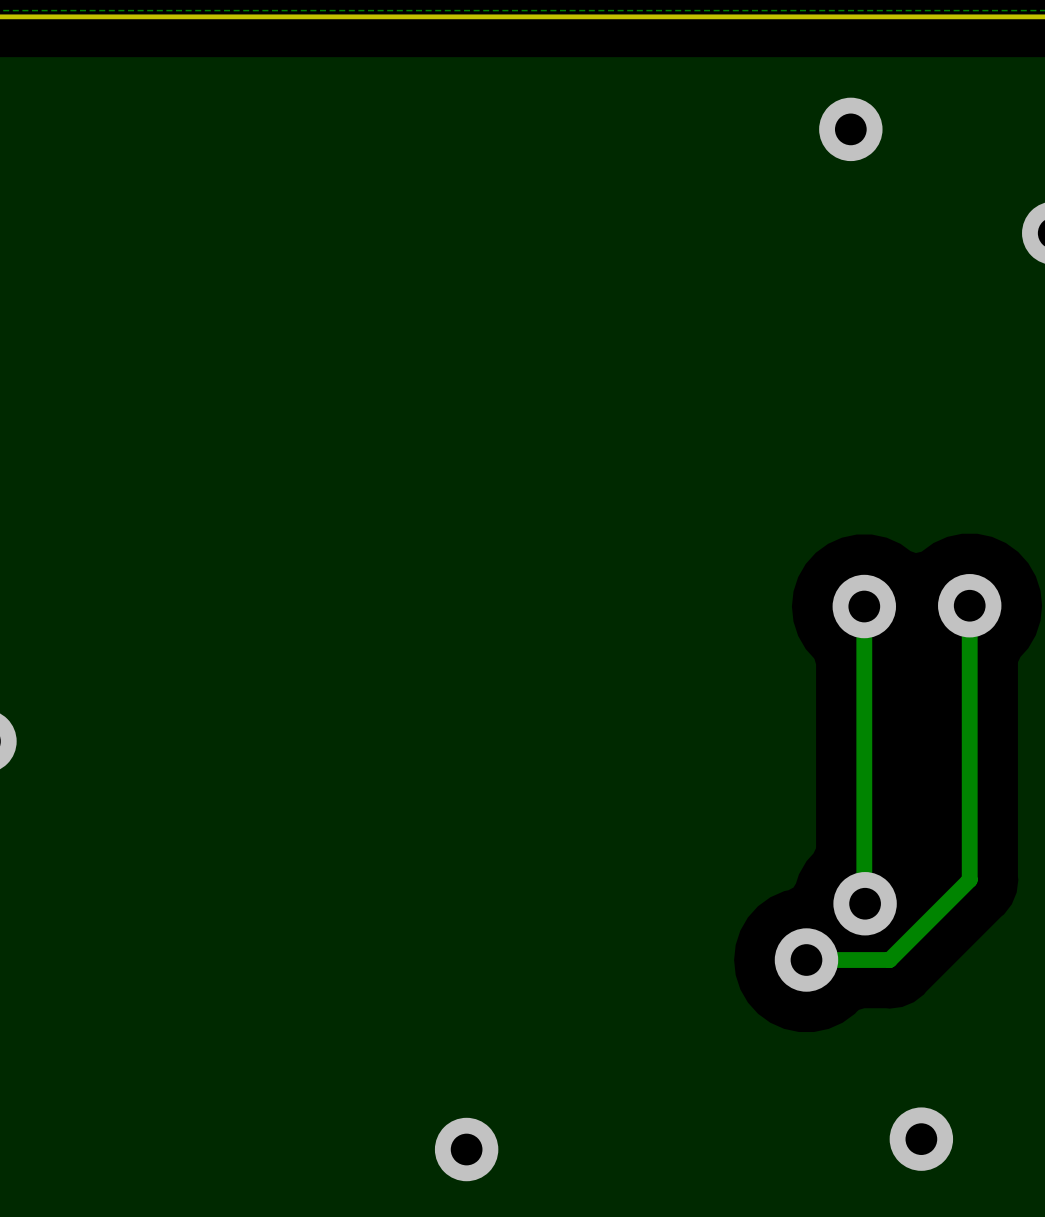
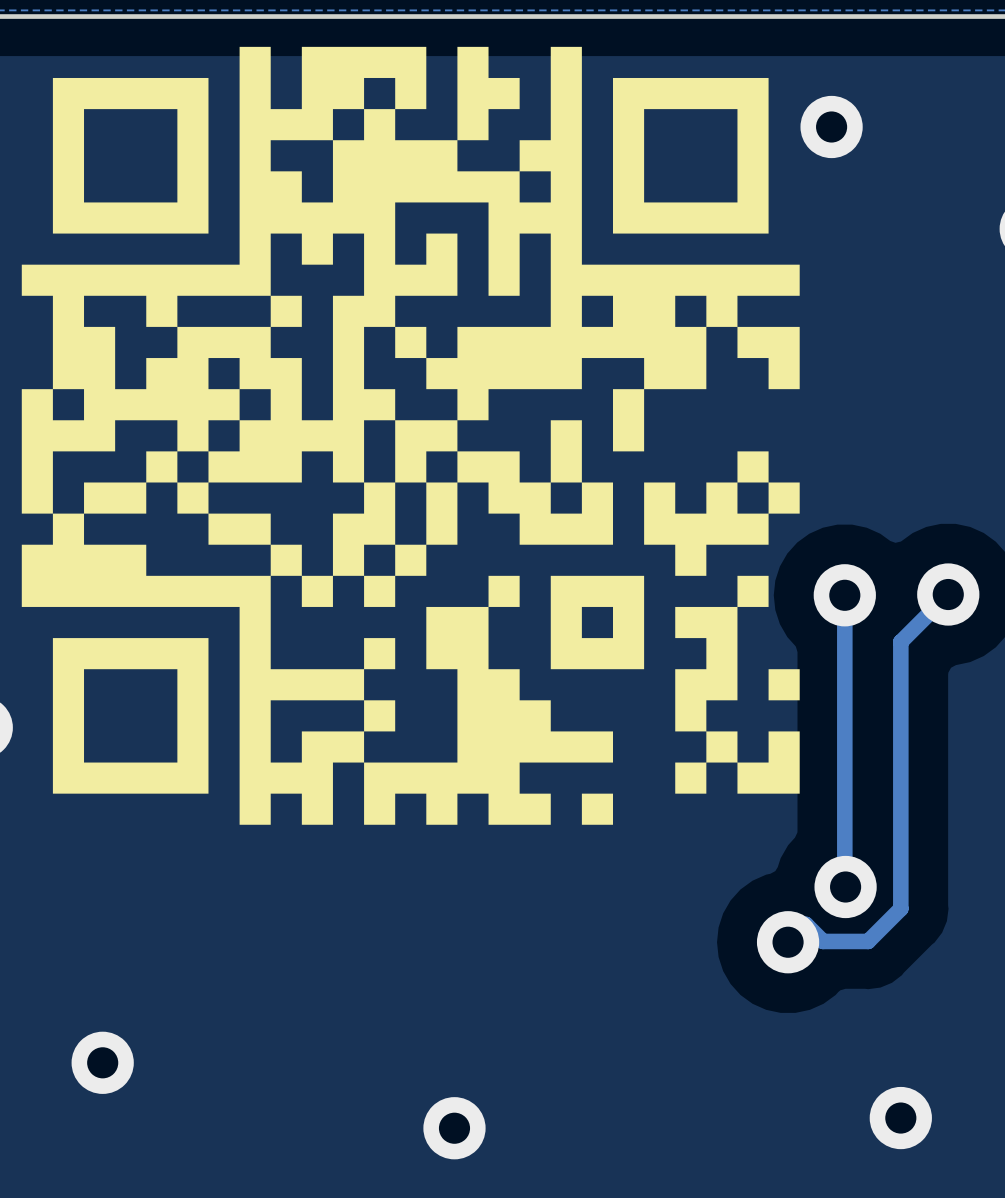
drawing: none -> [21, 46, 800, 825]
track: (969, 605) (969, 879) (889, 960) (806, 960) -> (948, 594) (900, 641) (900, 908) (868, 941) (823, 941) (805, 924) (788, 942)
via: none -> (102, 1062)

